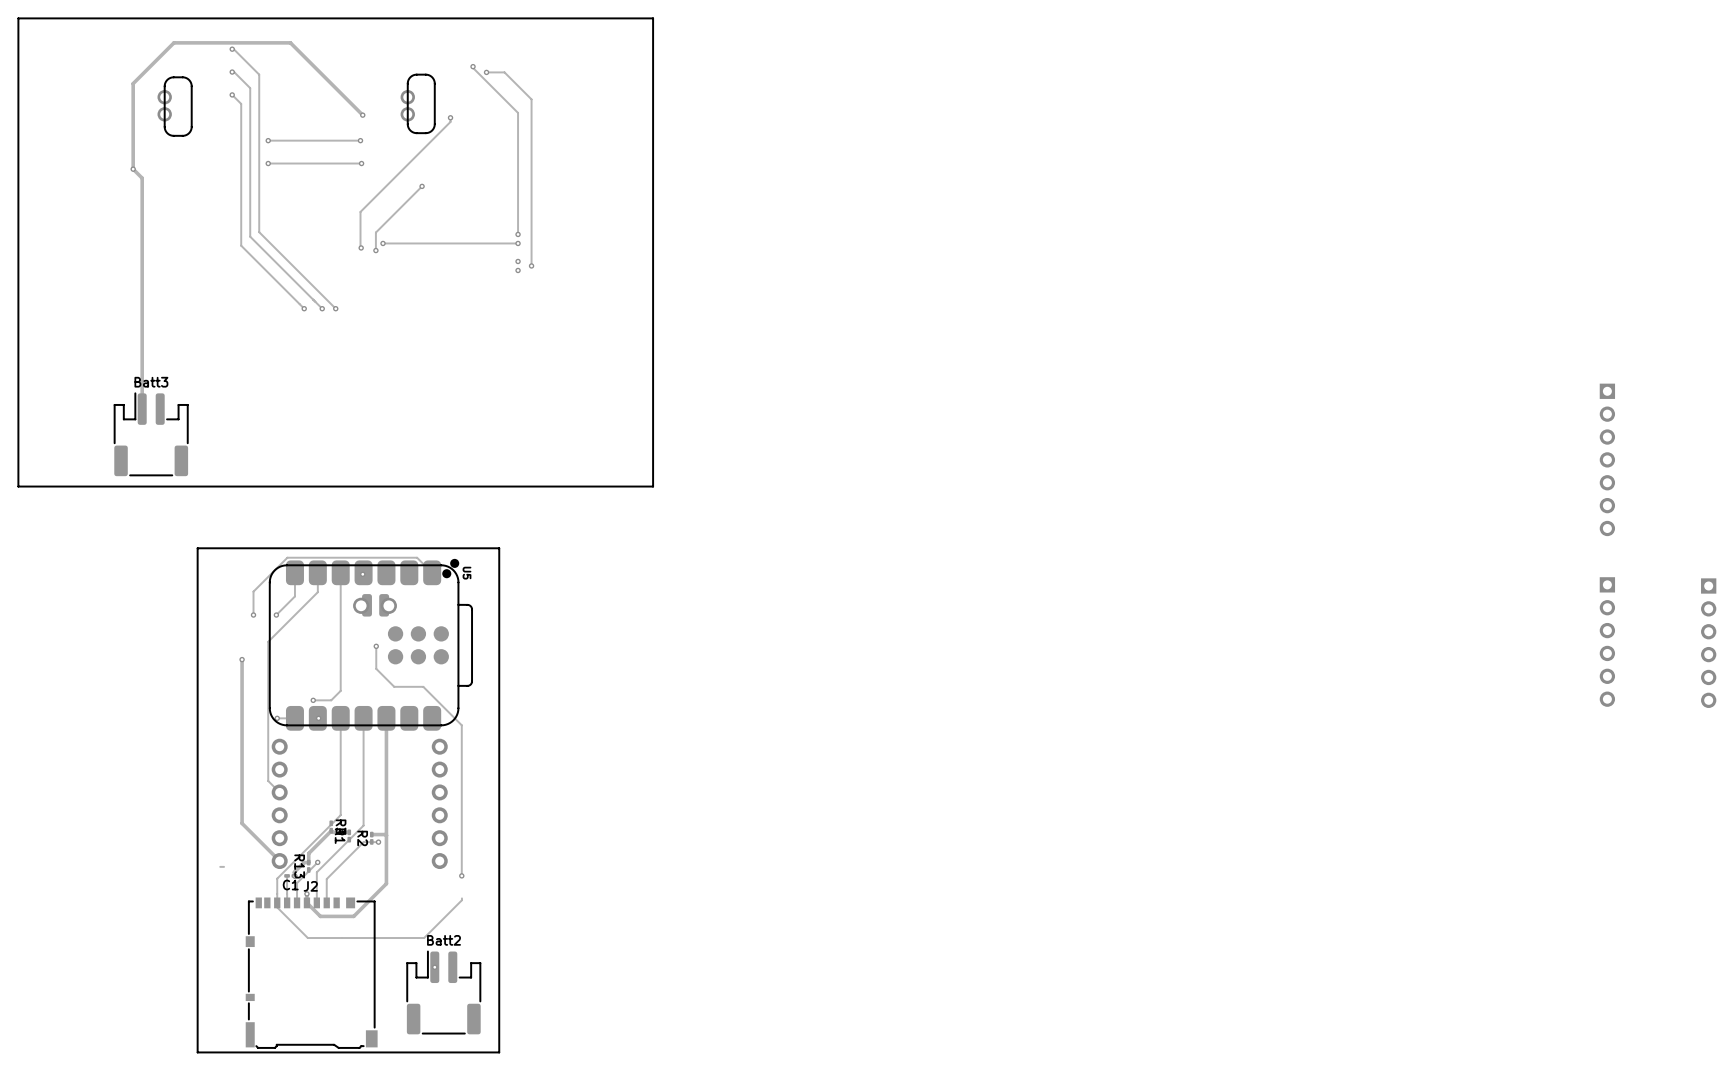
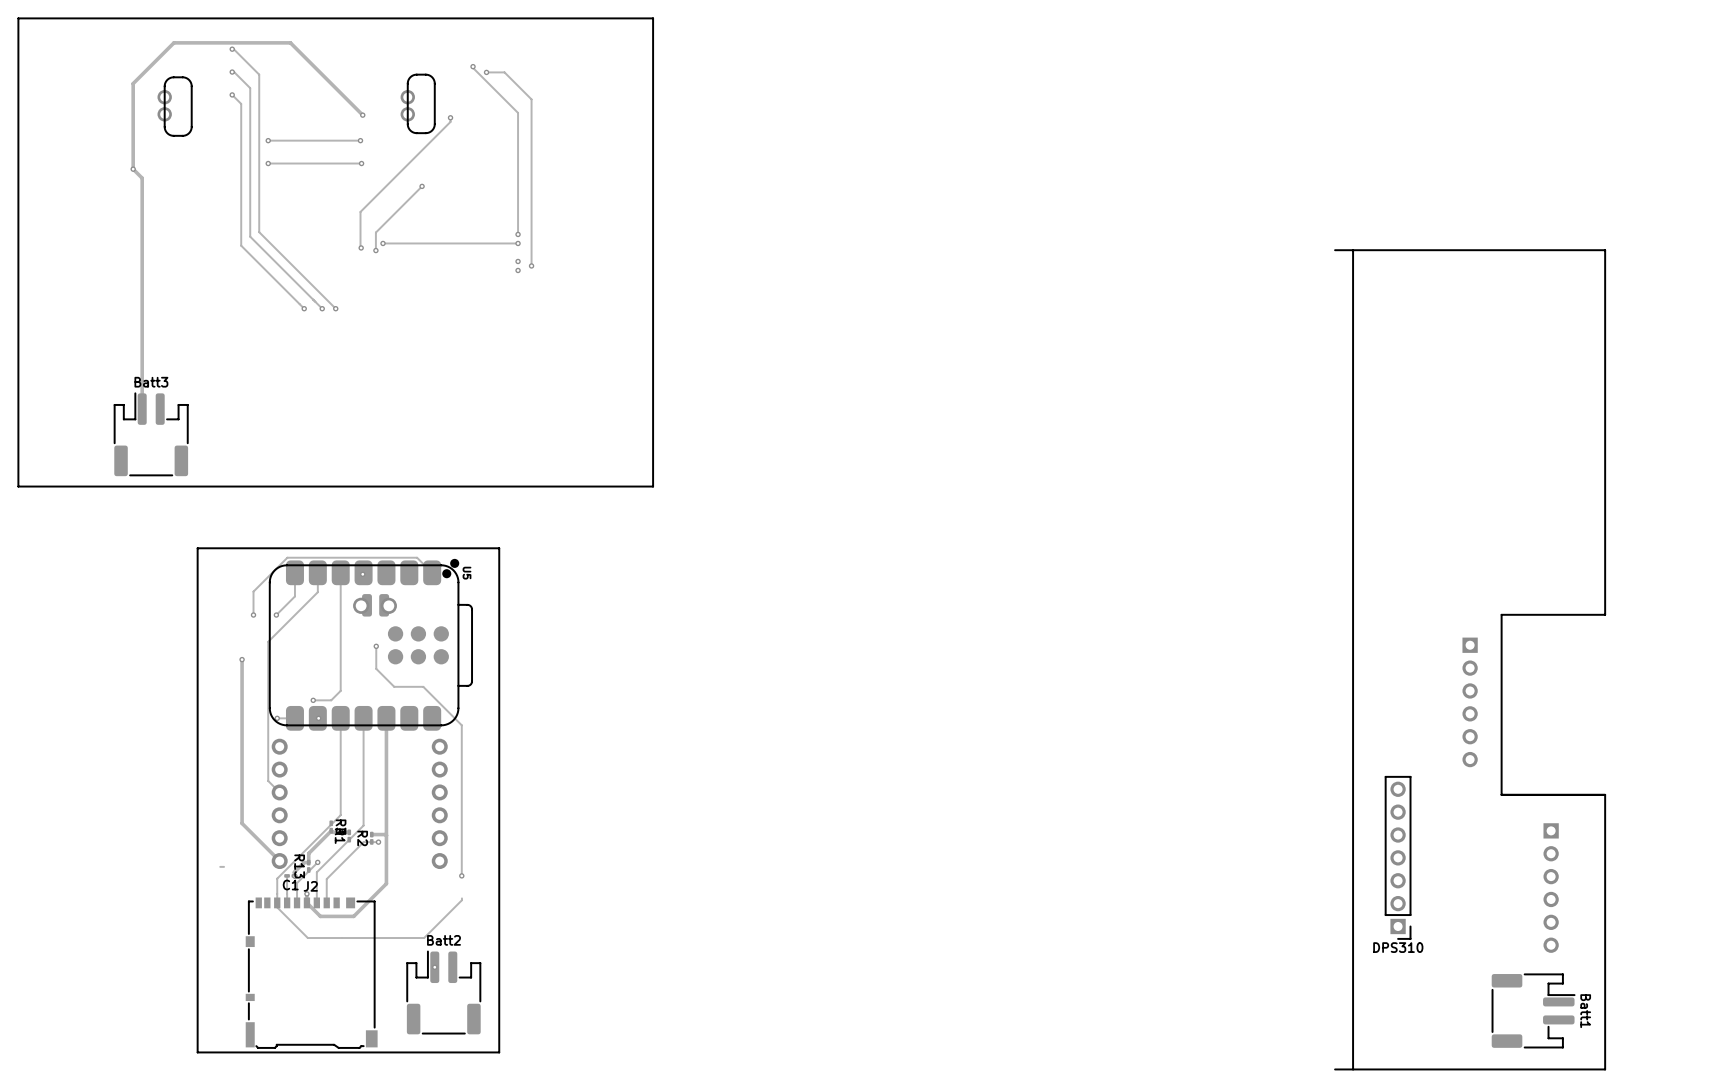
board edge: none -> (1335, 250) (1605, 250) (1605, 614) (1501, 614) (1501, 794) (1605, 794) (1605, 1069) (1335, 1069)
board edge: none -> (1353, 250) (1353, 1069)
part: (1607, 459) -> none
part: (1607, 642) -> none
part: (1708, 643) -> none
part: none -> (1470, 702)
DPS310: none -> (1398, 857)
part: none -> (1551, 888)
Batt1: none -> (1533, 1010)

